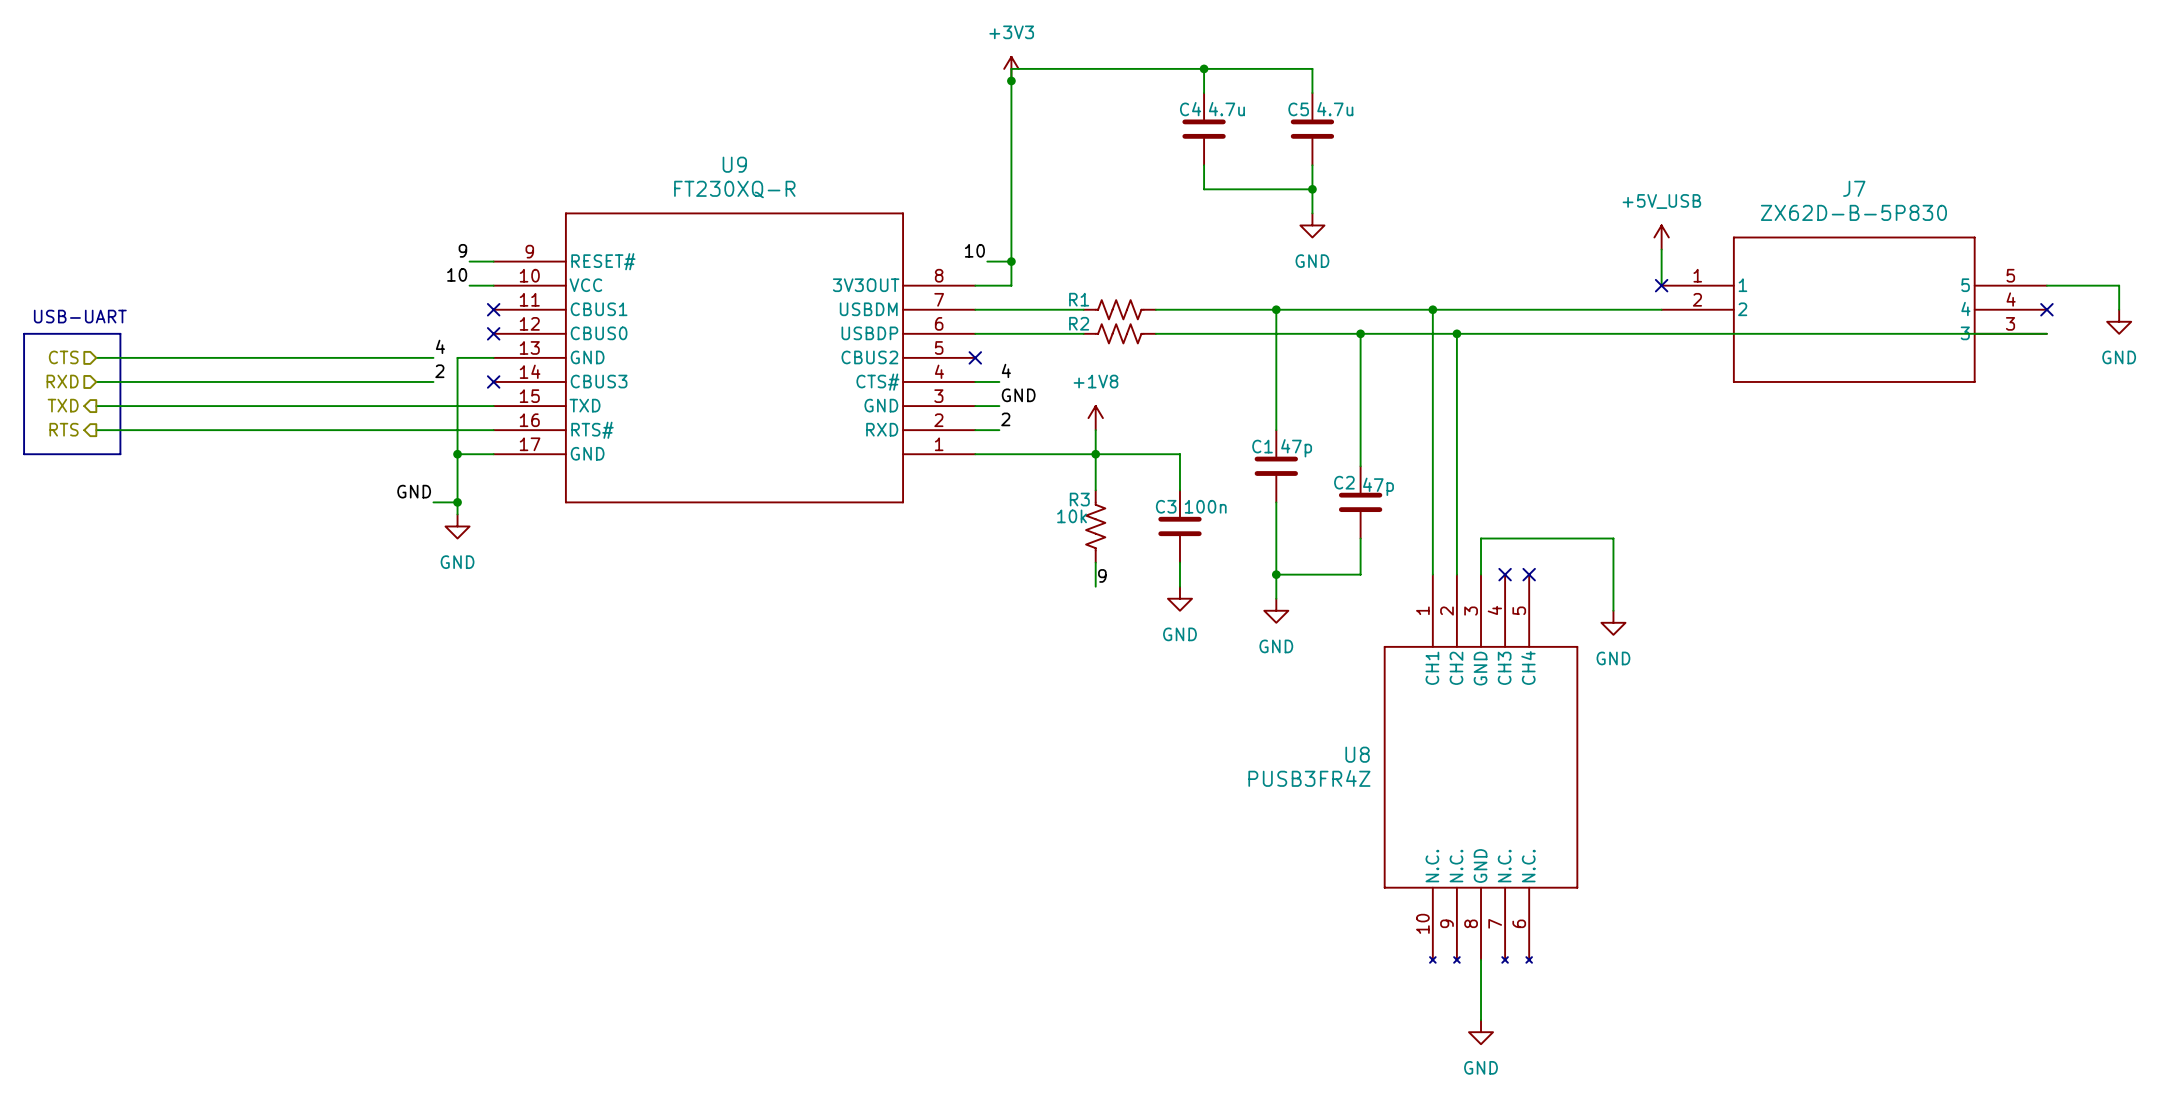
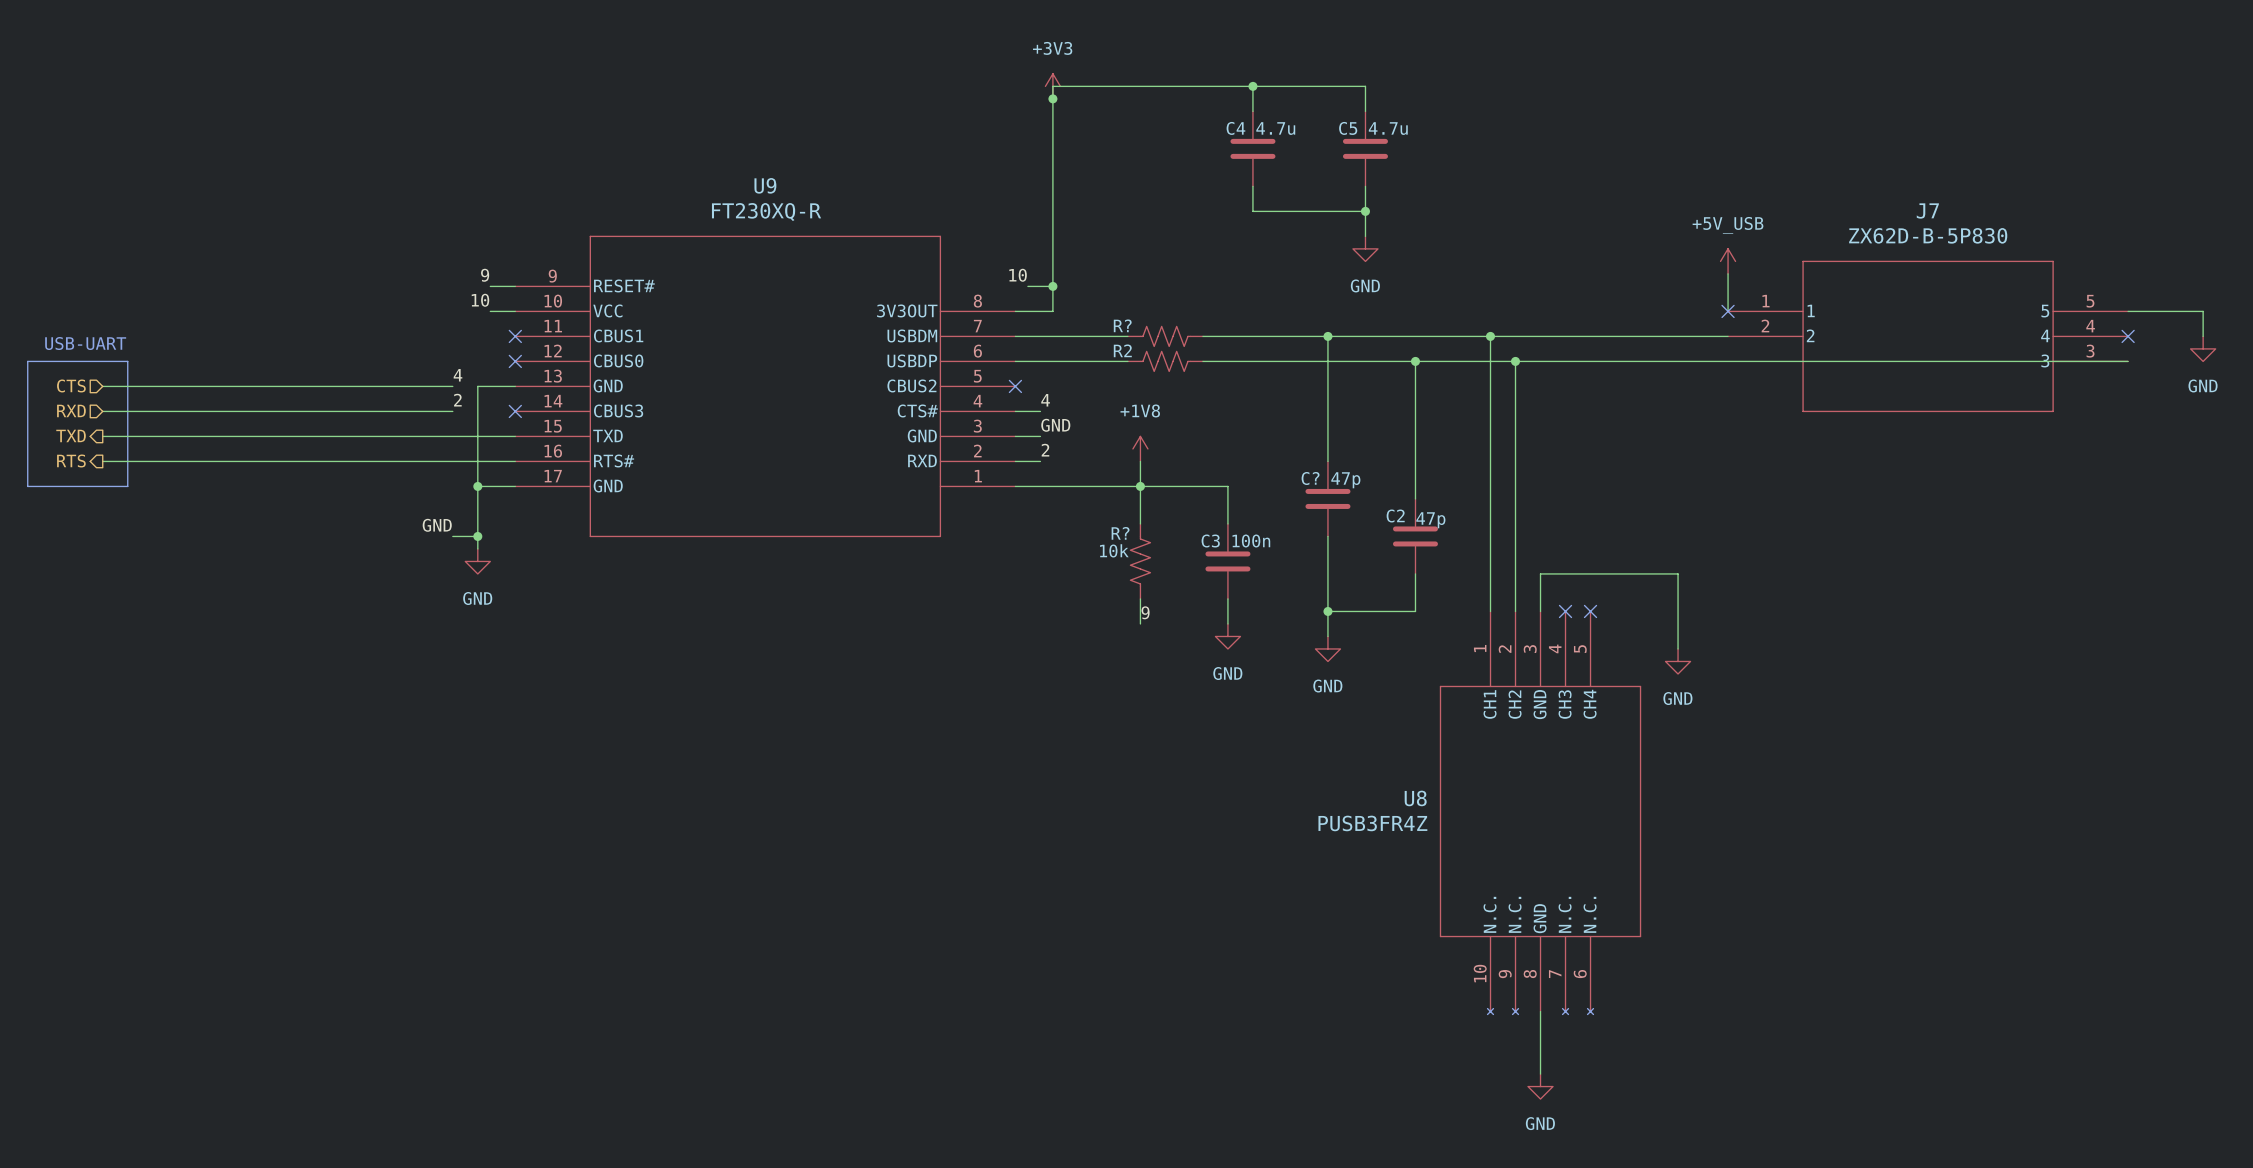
R1 name: R1 (1079, 299) -> R? (1122, 325)
C1 name: C1 (1262, 446) -> C? (1310, 478)
R3 name: R3 (1079, 499) -> R? (1120, 533)

